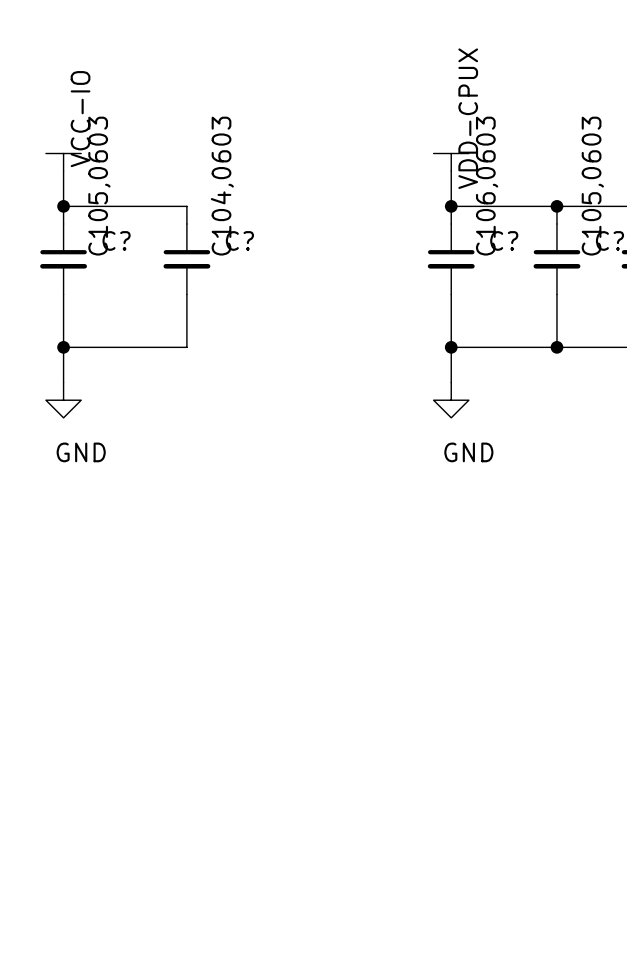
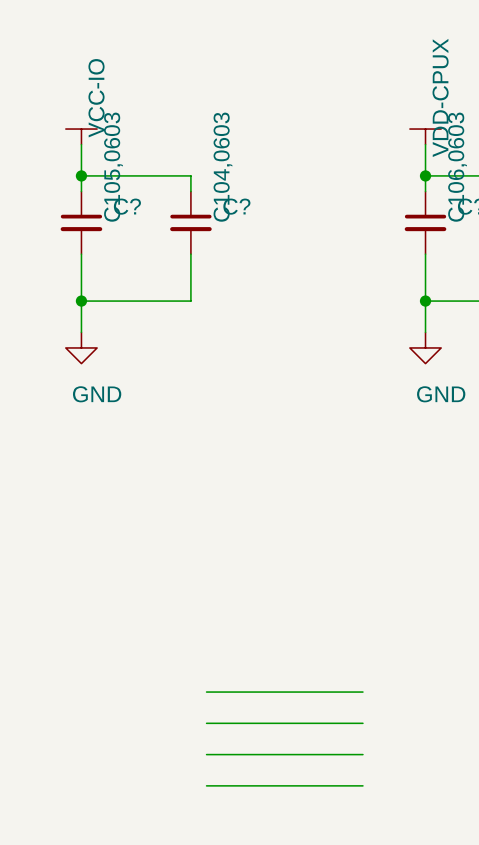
wire: none -> (206, 692) (362, 692)
wire: none -> (206, 723) (362, 723)
wire: none -> (206, 754) (362, 754)
wire: none -> (206, 785) (362, 785)

